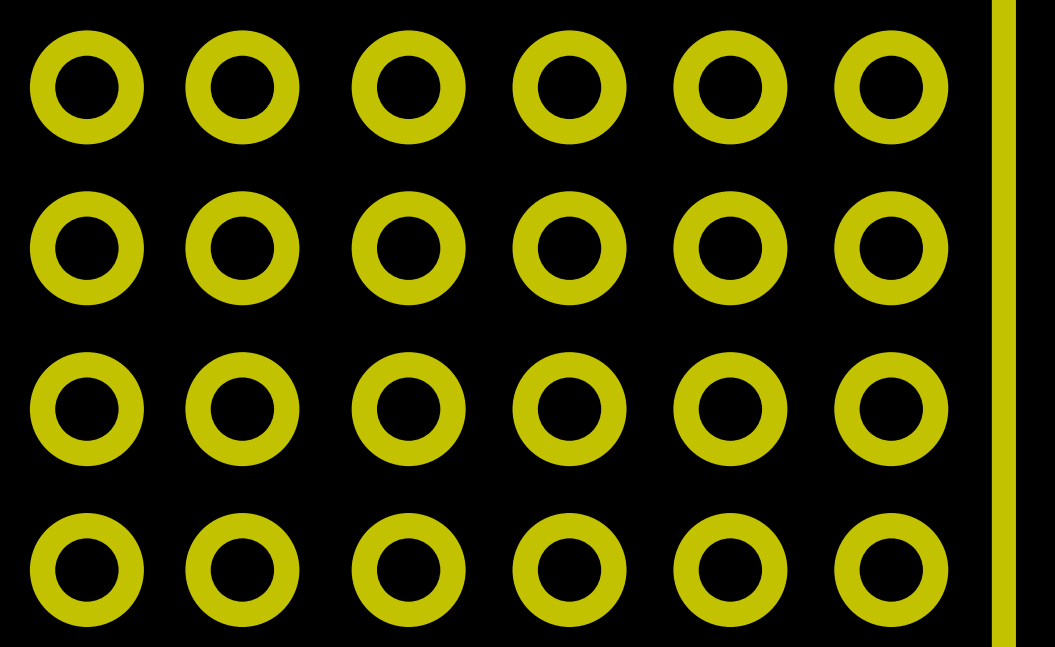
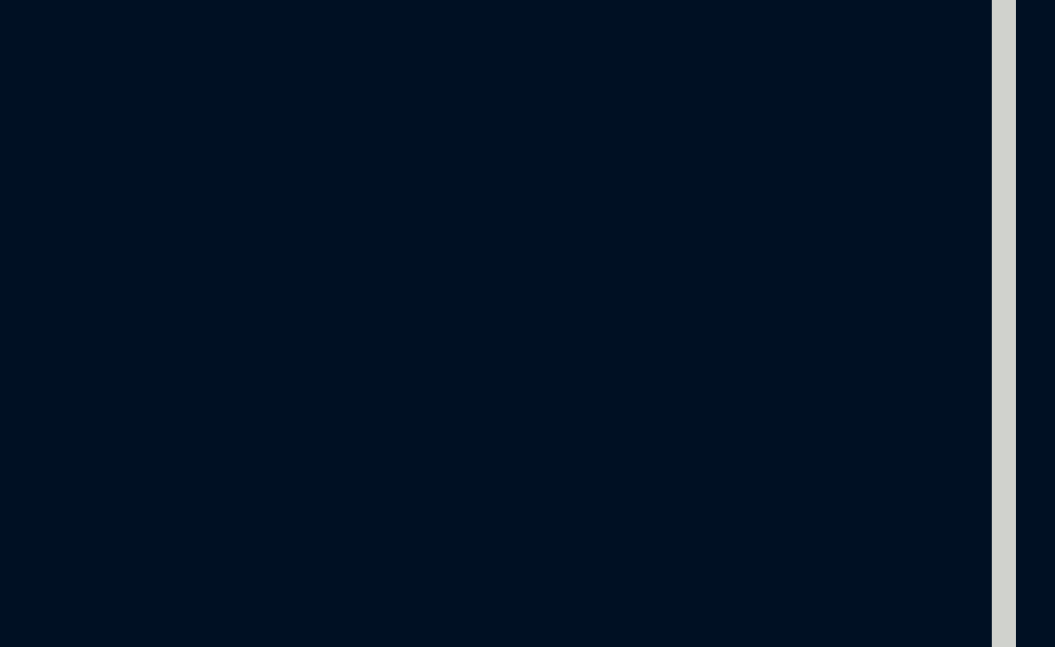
part: (86, 87) -> none
part: (242, 87) -> none
part: (408, 87) -> none
part: (569, 87) -> none
part: (730, 87) -> none
part: (891, 87) -> none
part: (86, 248) -> none
part: (242, 248) -> none
part: (408, 248) -> none
part: (569, 248) -> none
part: (730, 248) -> none
part: (891, 248) -> none
part: (86, 409) -> none
part: (242, 409) -> none
part: (408, 409) -> none
part: (569, 409) -> none
part: (730, 409) -> none
part: (891, 409) -> none
part: (86, 570) -> none
part: (242, 570) -> none
part: (408, 570) -> none
part: (569, 570) -> none
part: (730, 570) -> none
part: (891, 570) -> none

